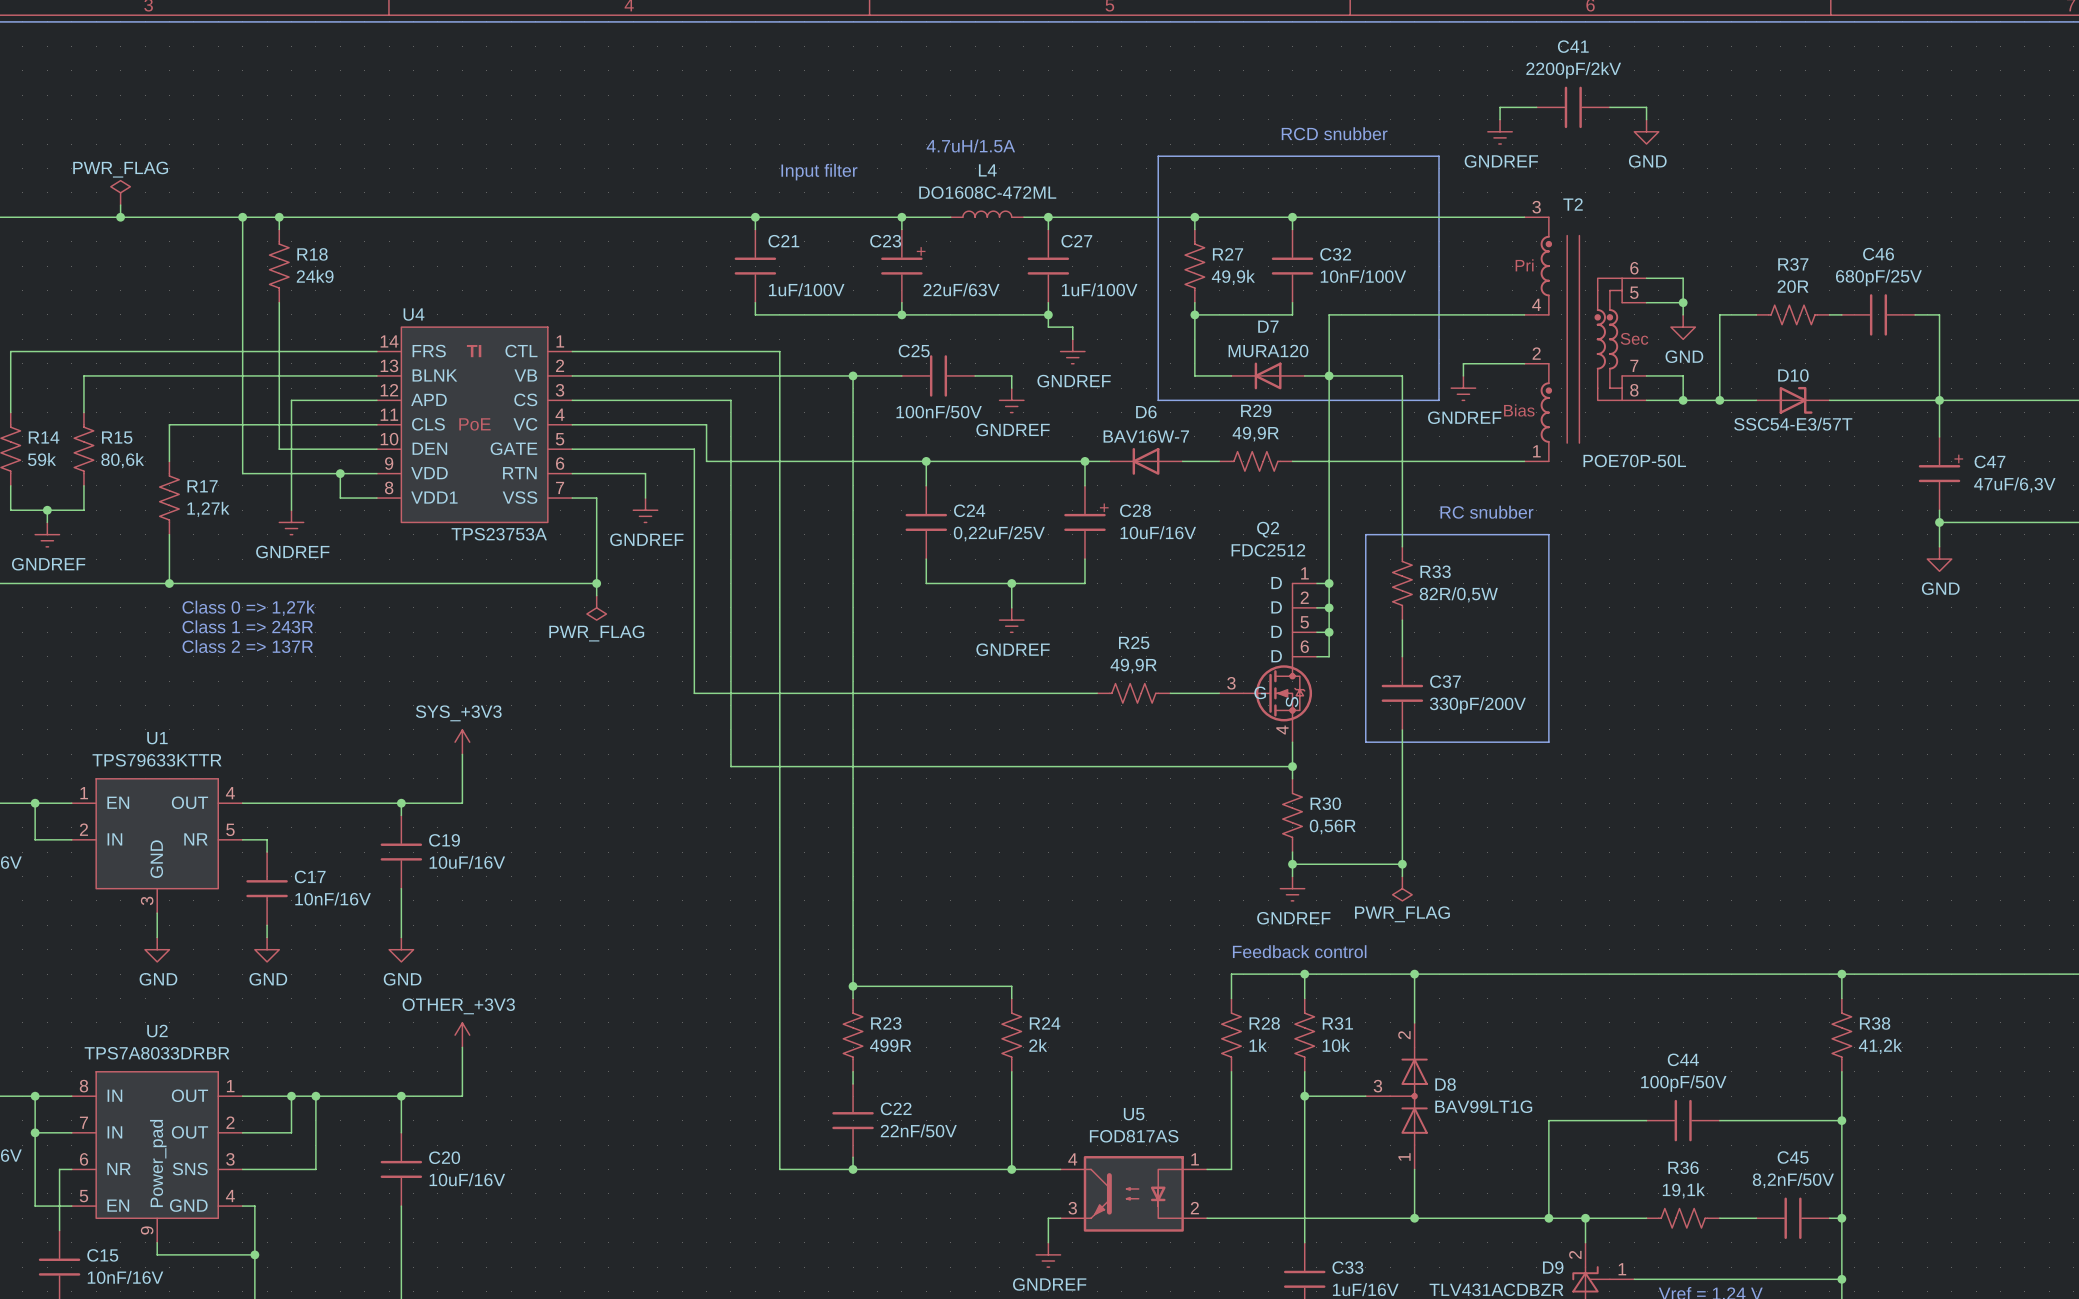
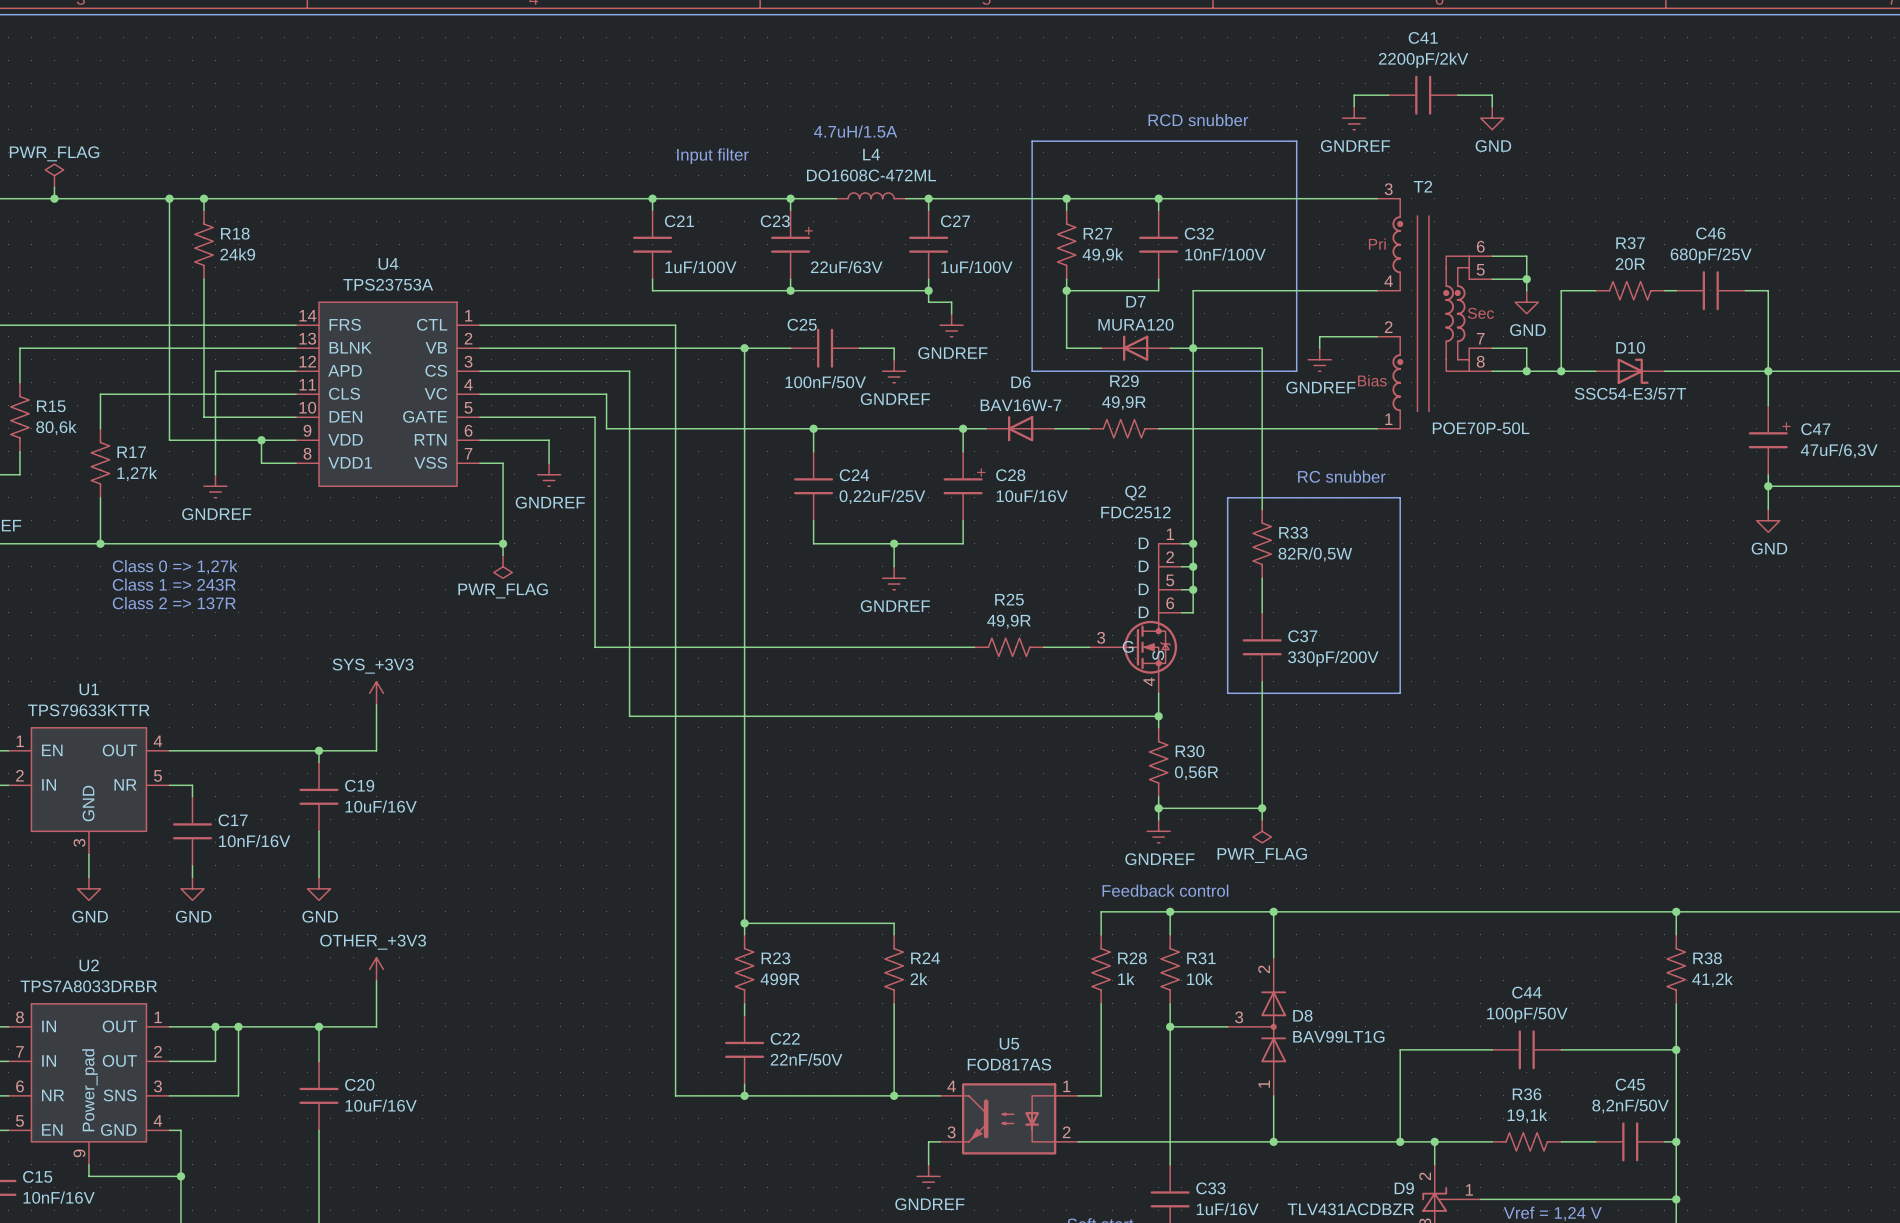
U4 name position: U4 (413, 314) -> U4 (388, 263)
U4 text: TI (474, 351) -> none
U4 text: PoE (474, 424) -> none
U4 value position: TPS23753A (499, 534) -> TPS23753A (388, 284)

